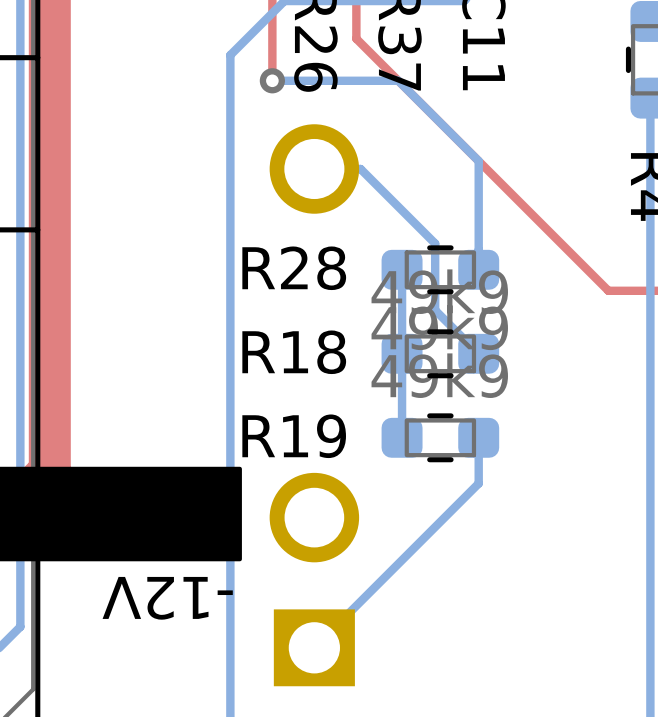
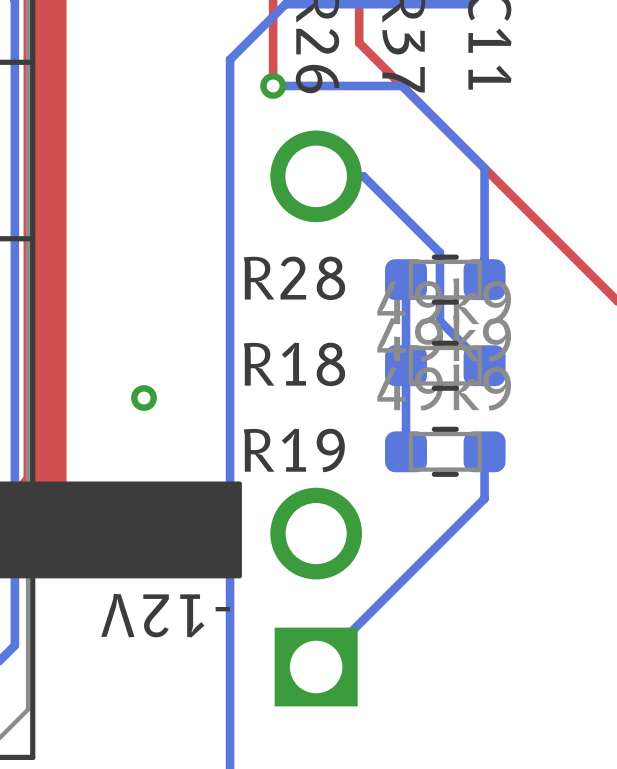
via: none -> (144, 398)

